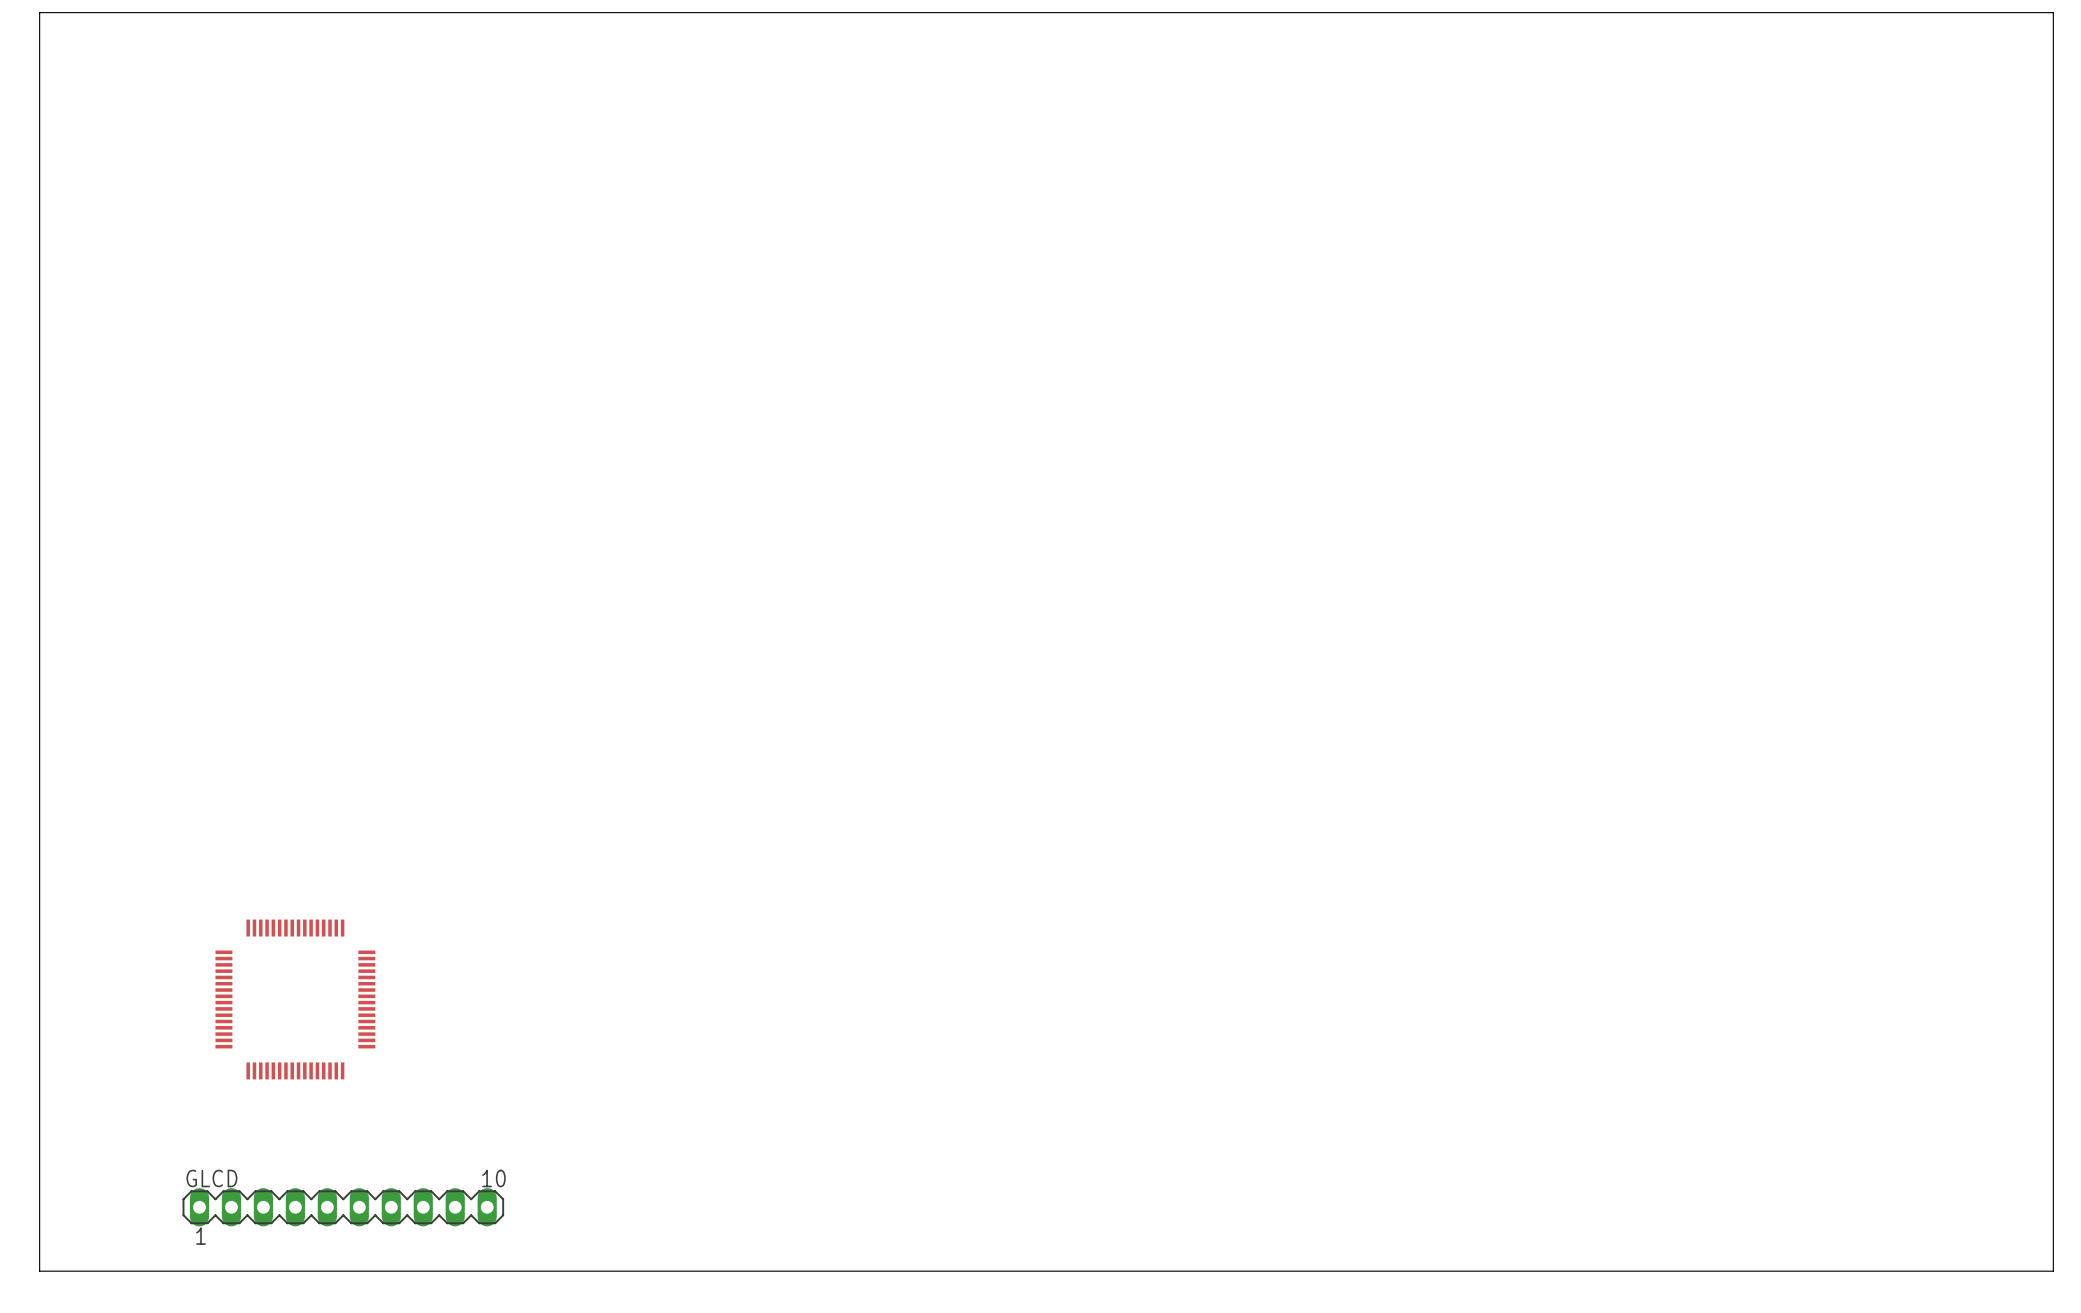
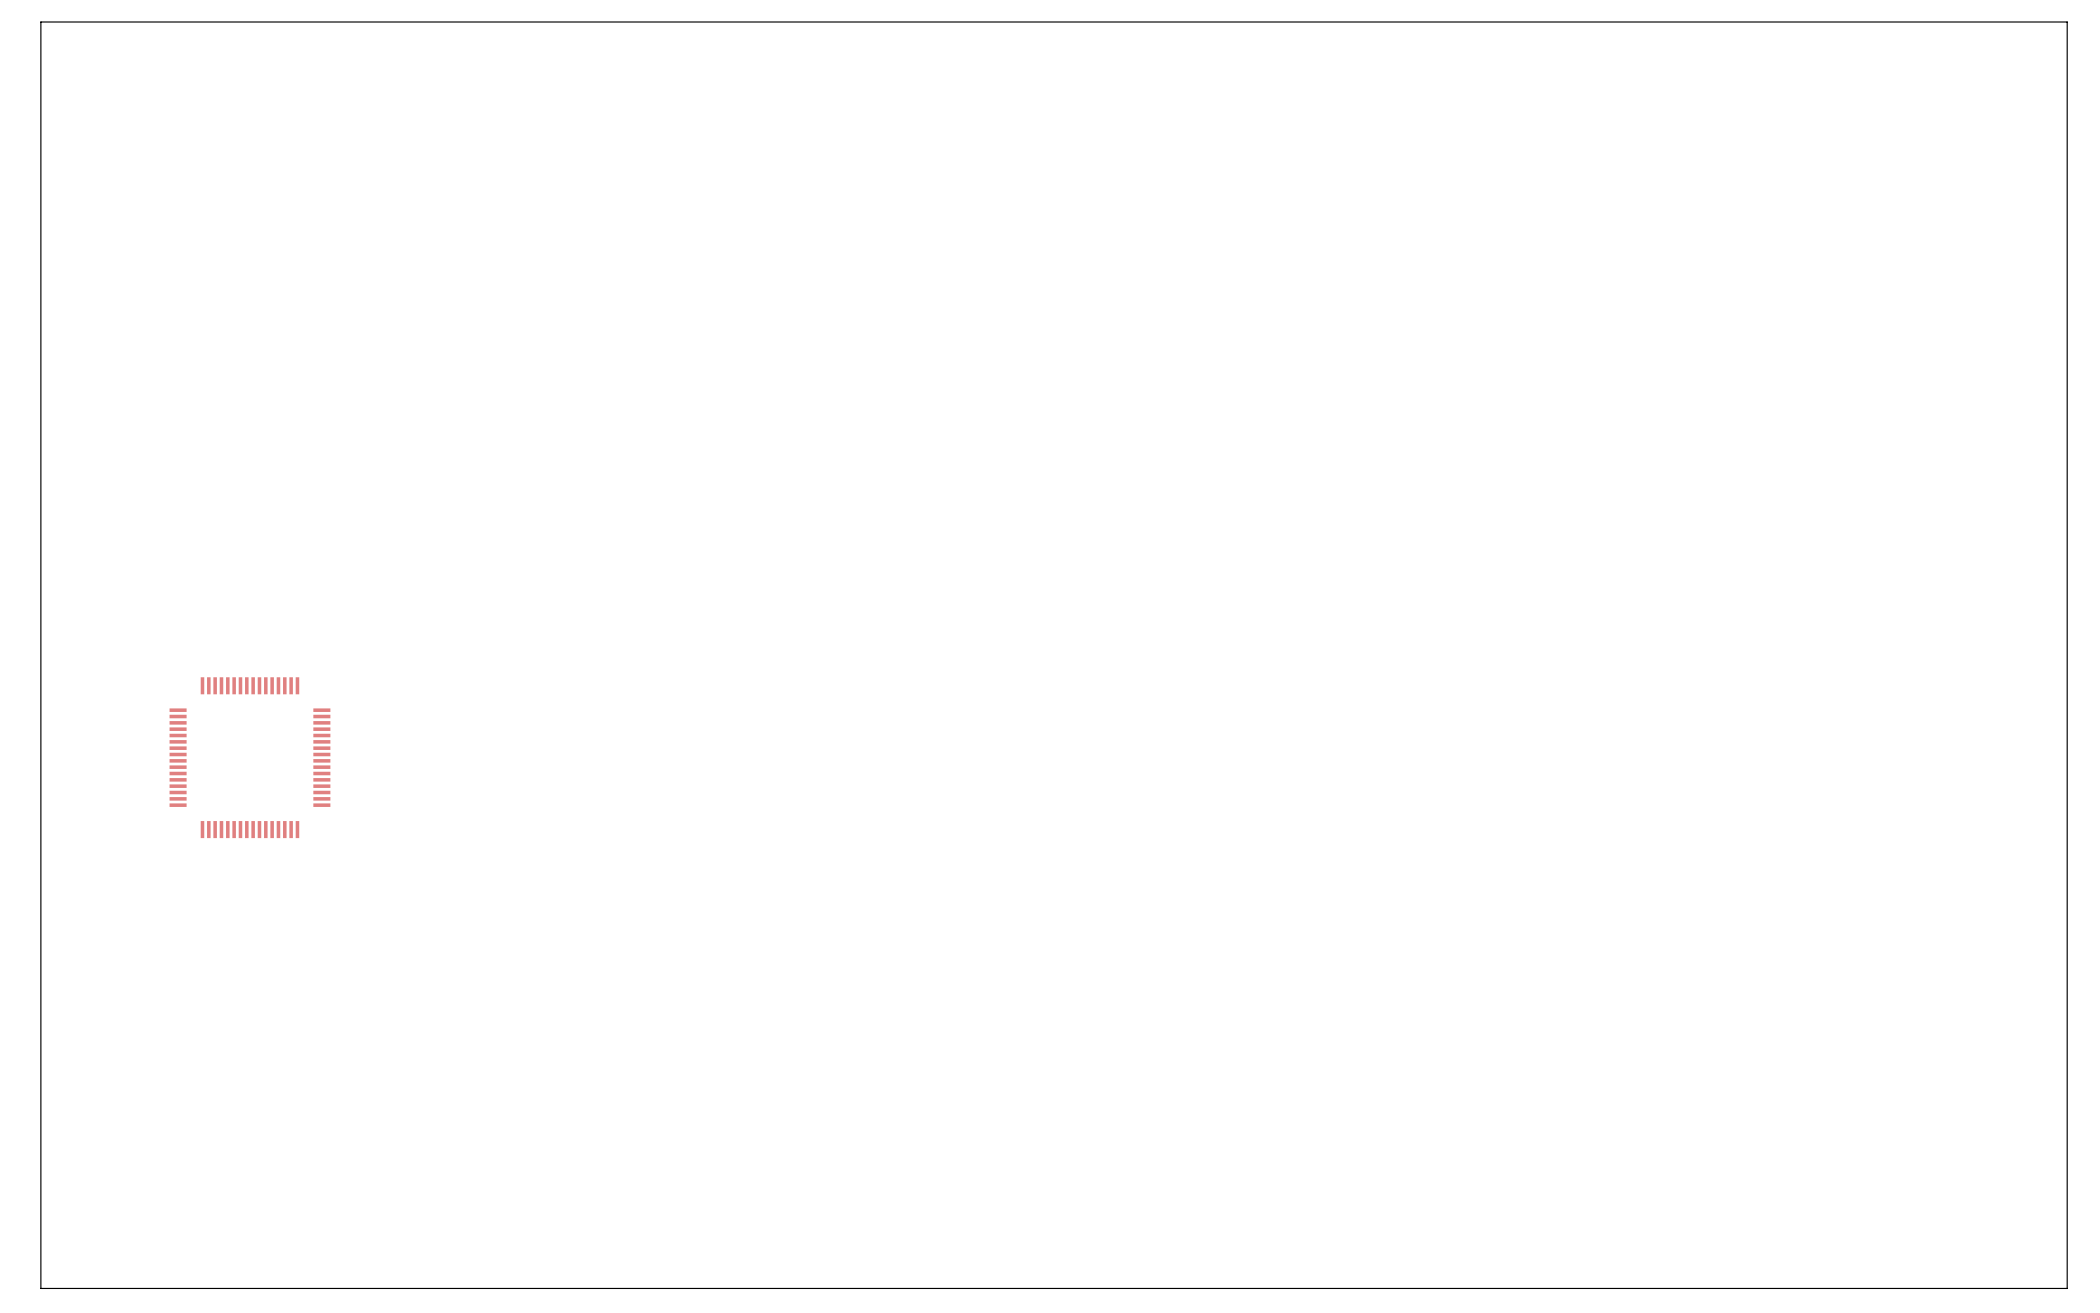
part position: (295, 999) -> (249, 757)
GLCD: (343, 1207) -> none

